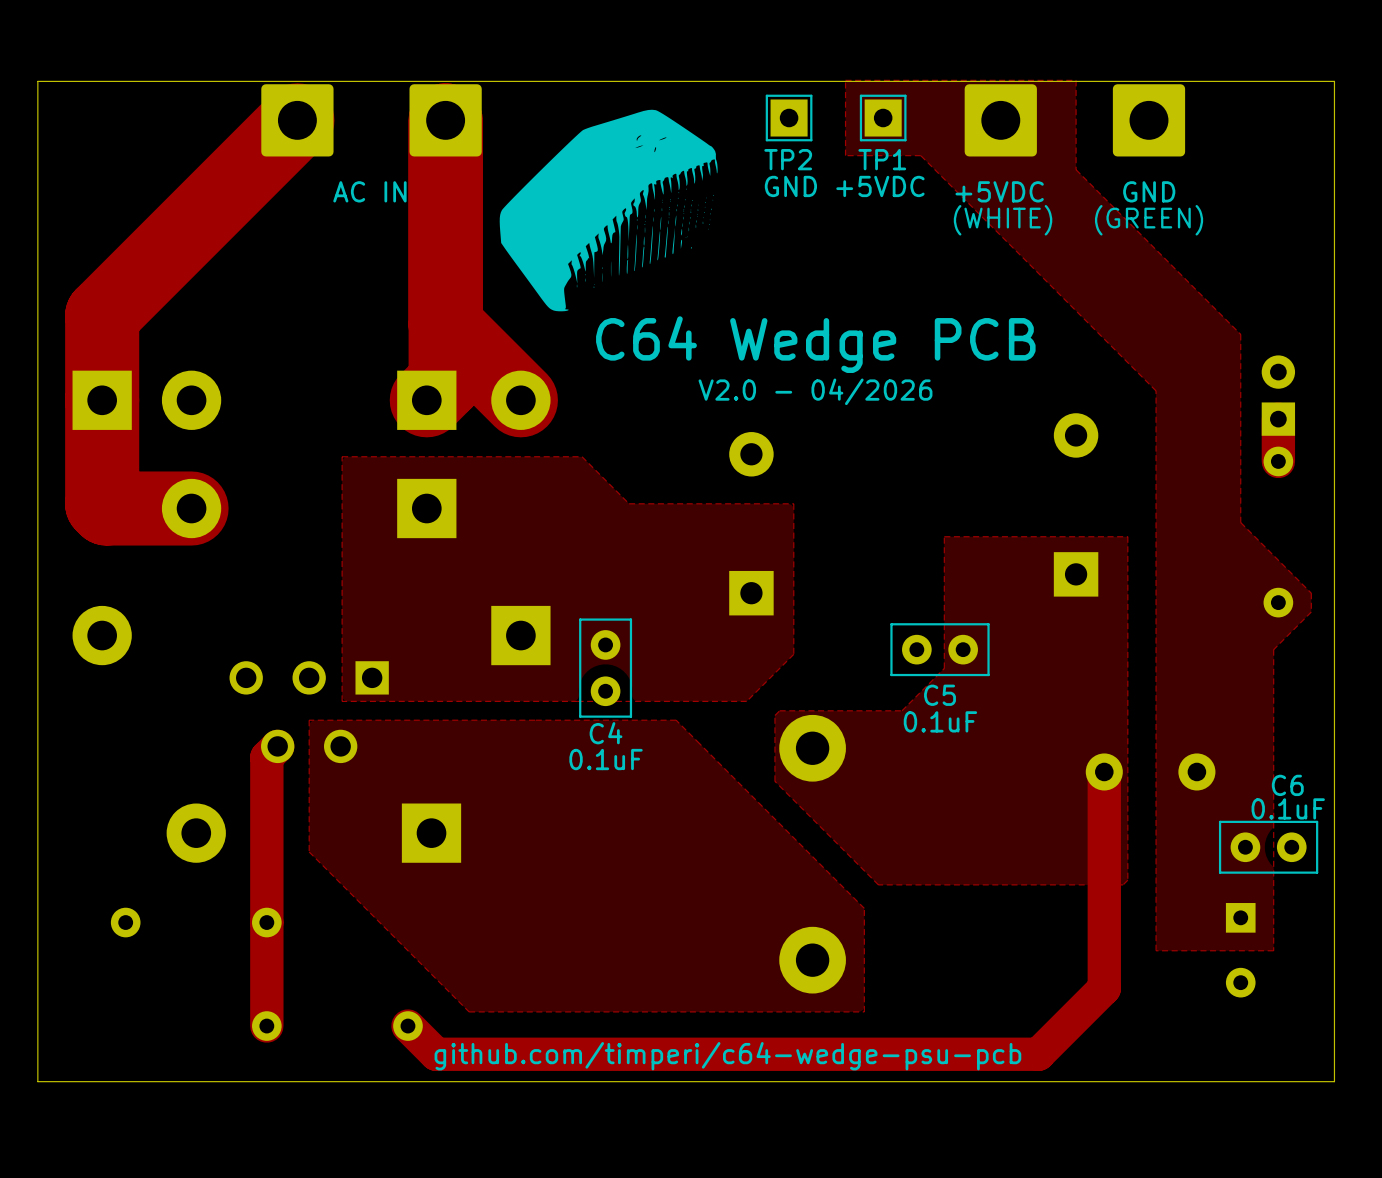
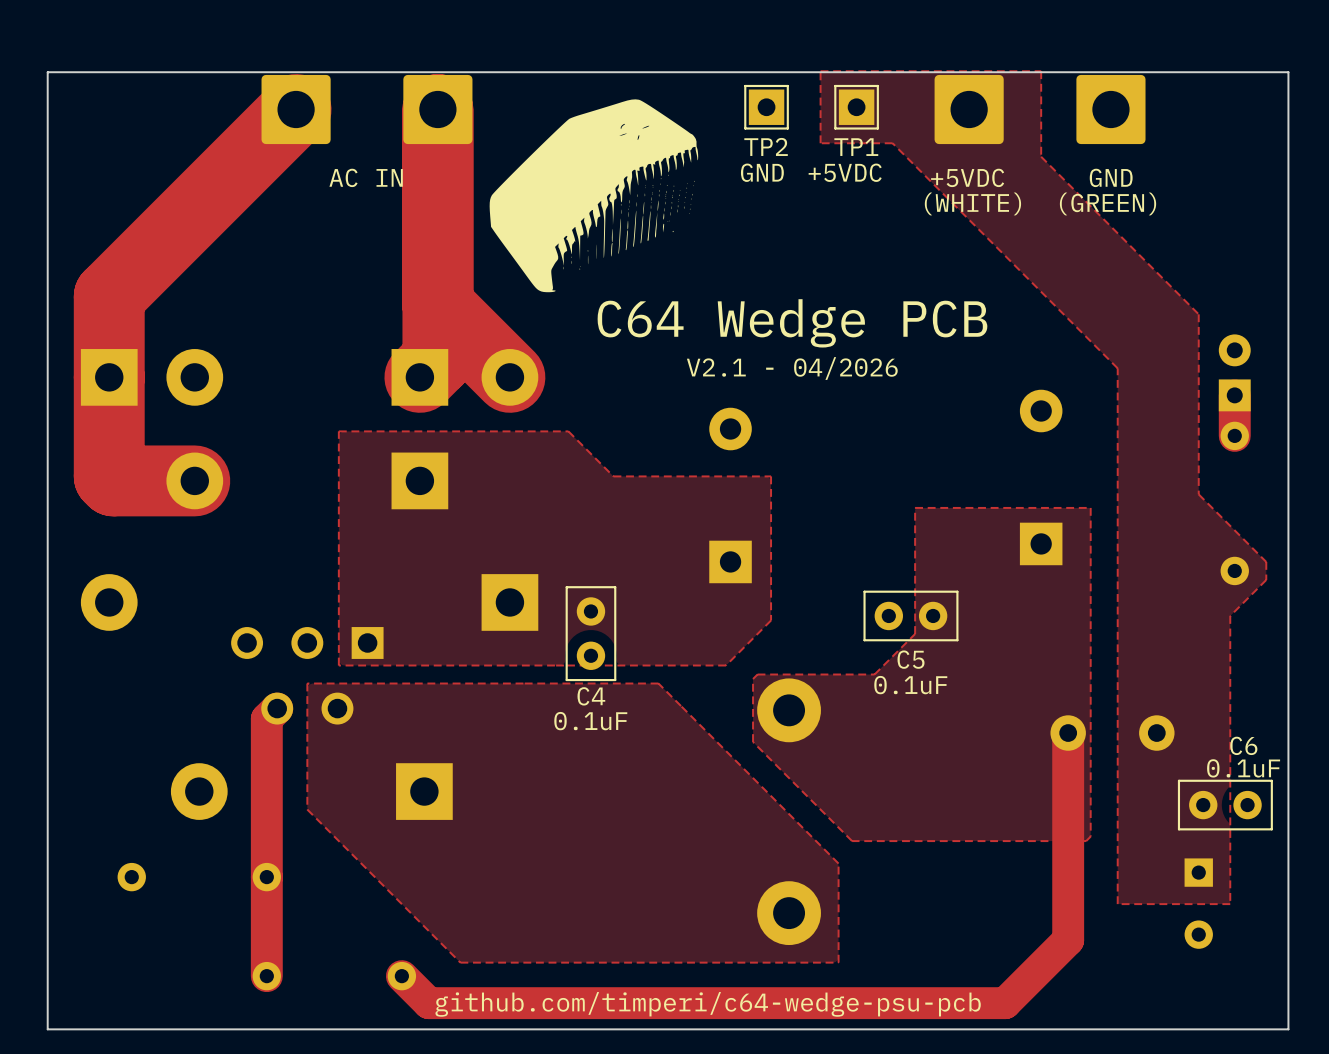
text: V2.0 - 04/2026 (815, 391) -> V2.1 - 04/2026 (792, 368)

